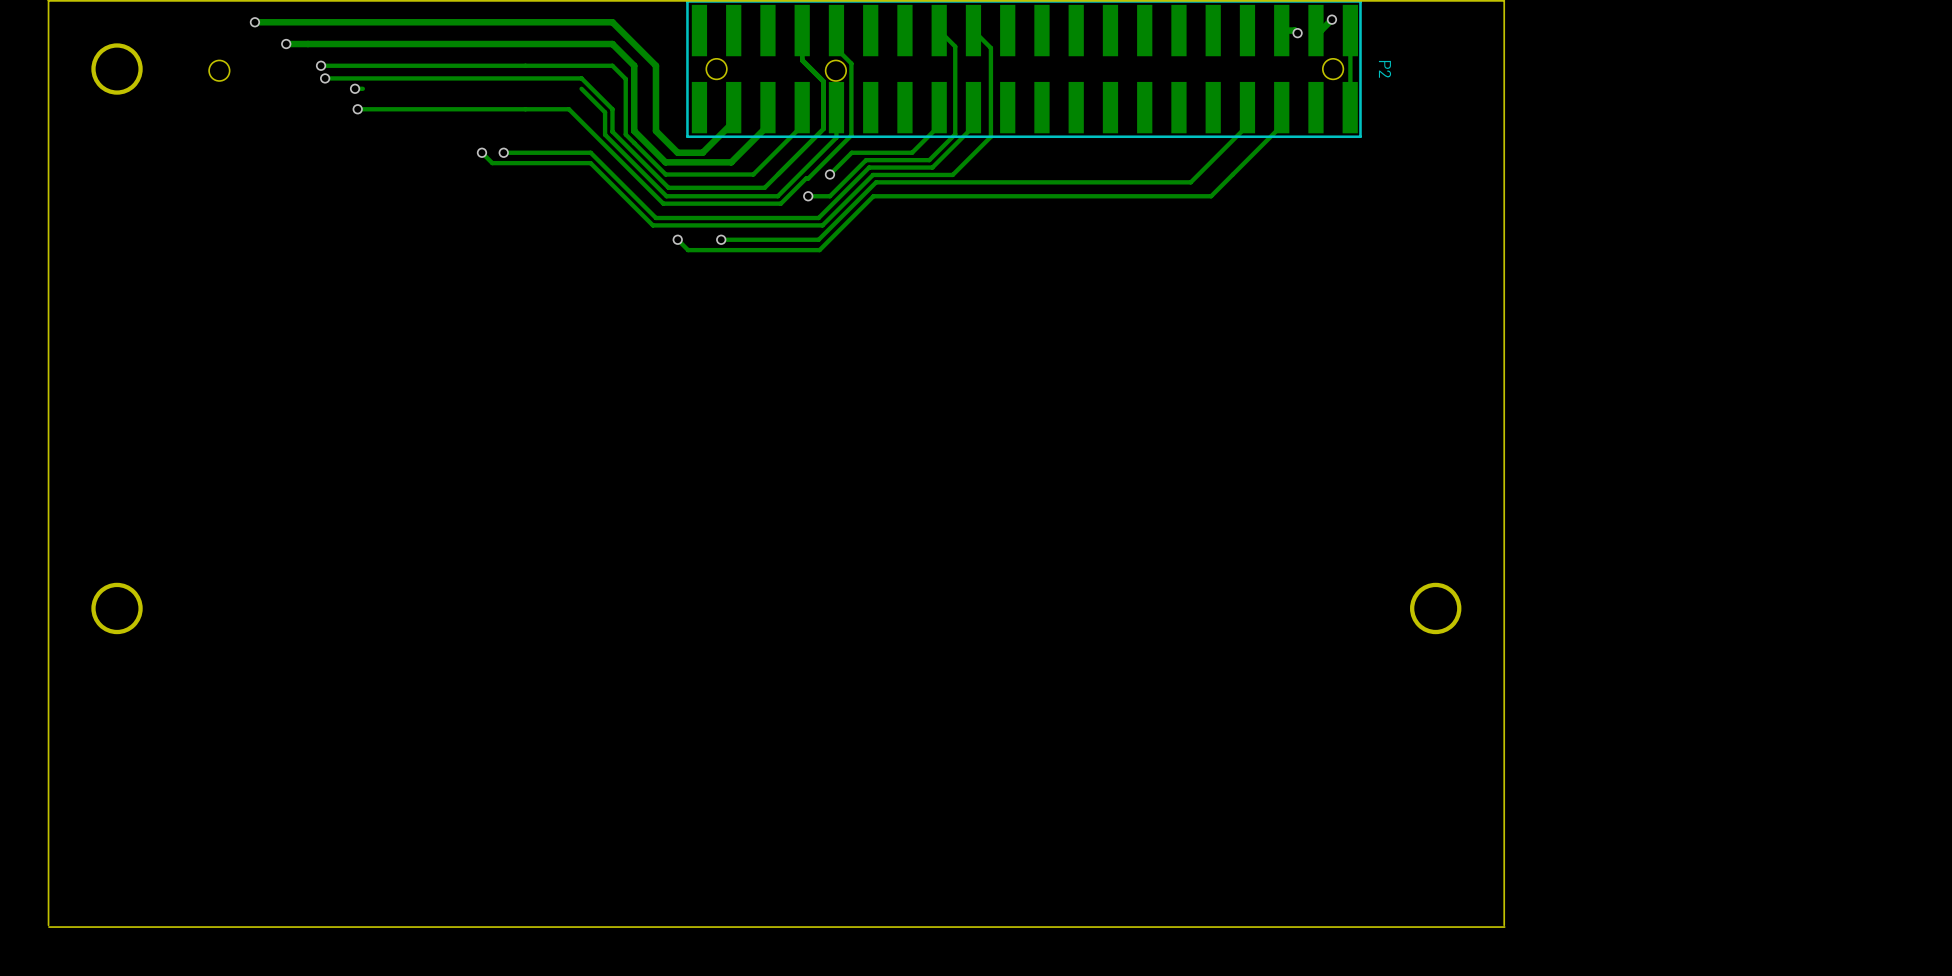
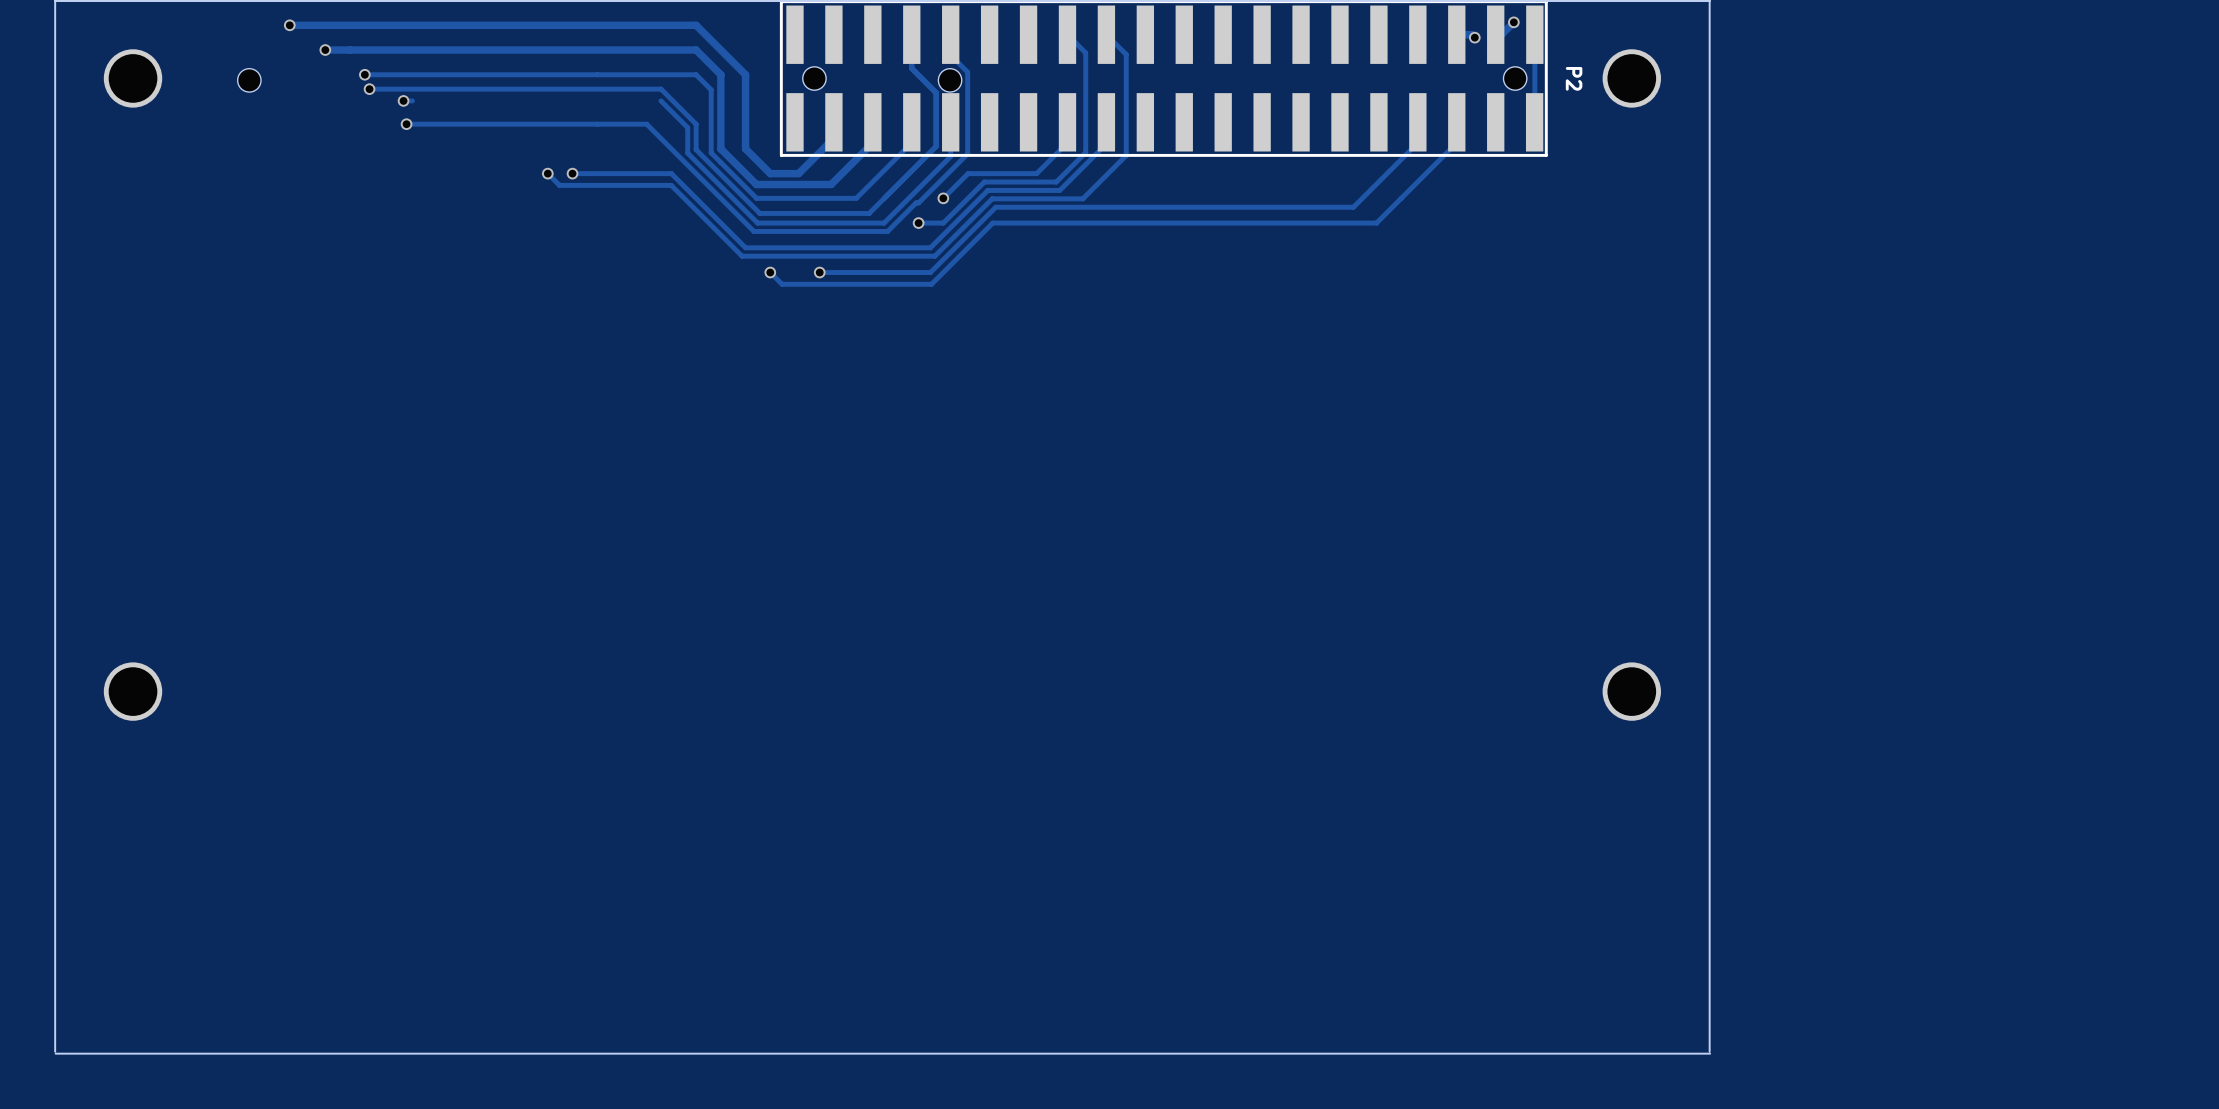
part: none -> (1631, 78)

